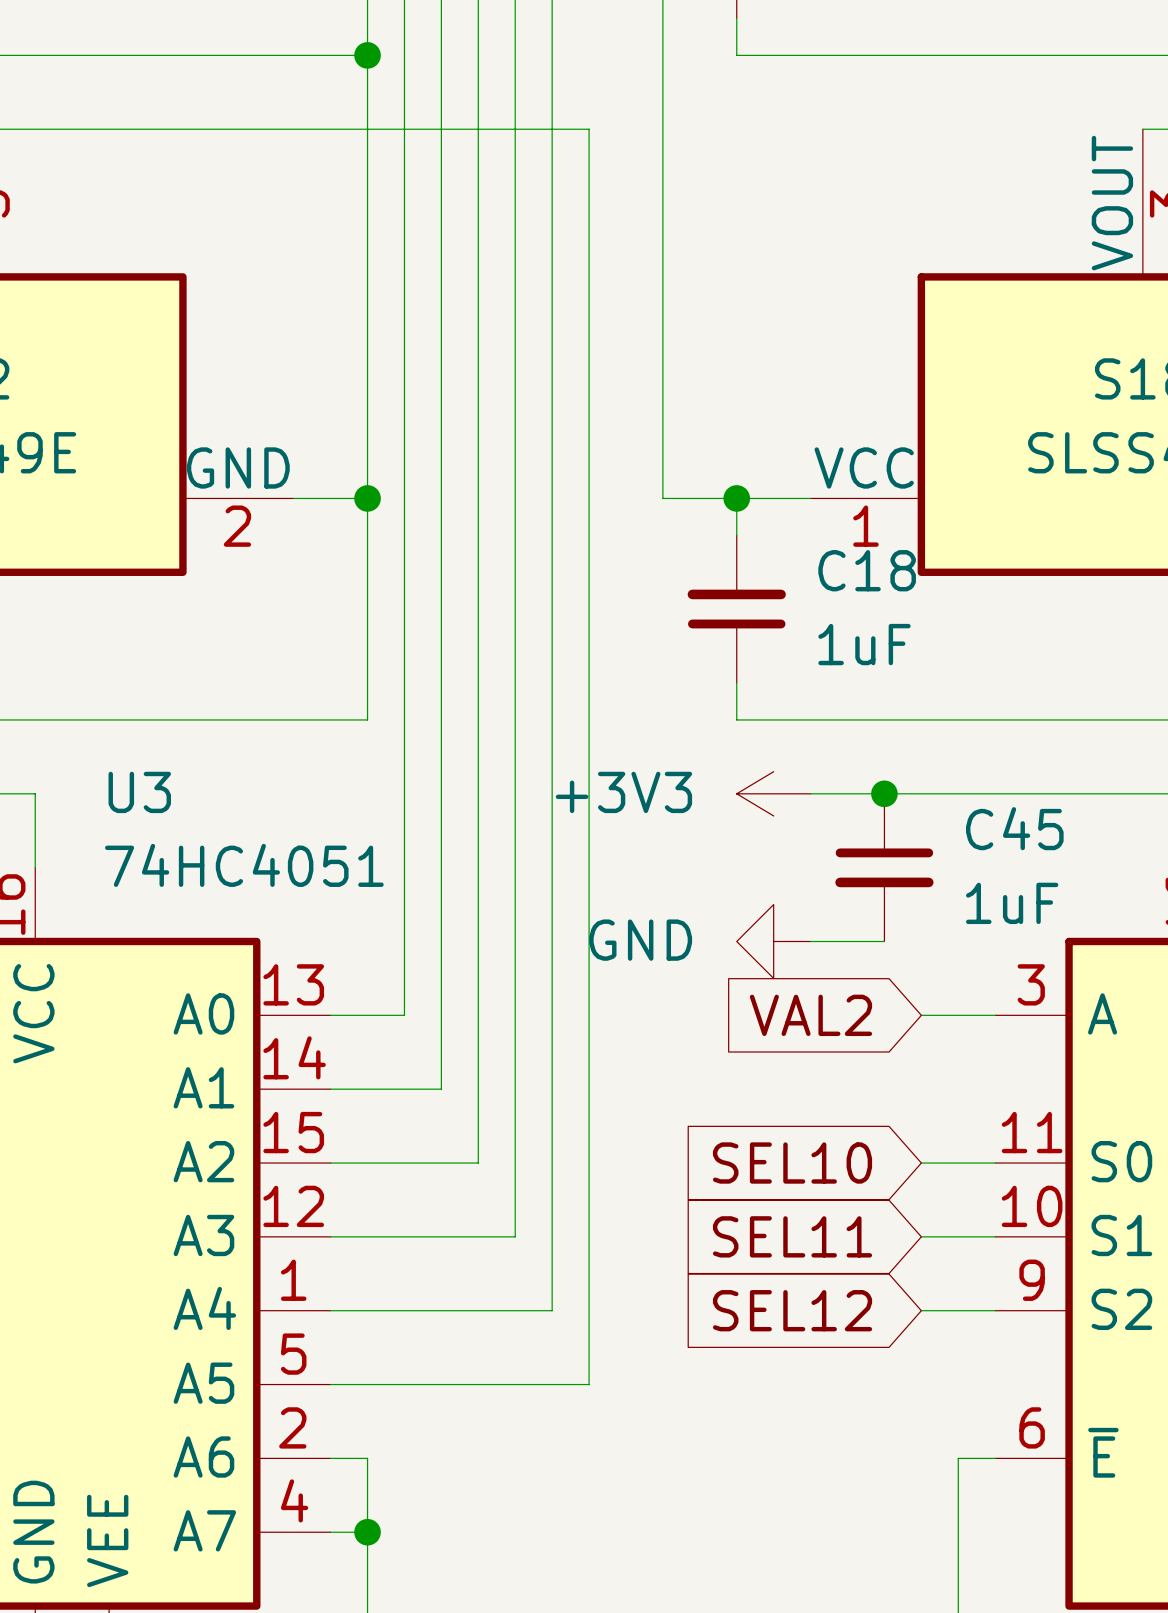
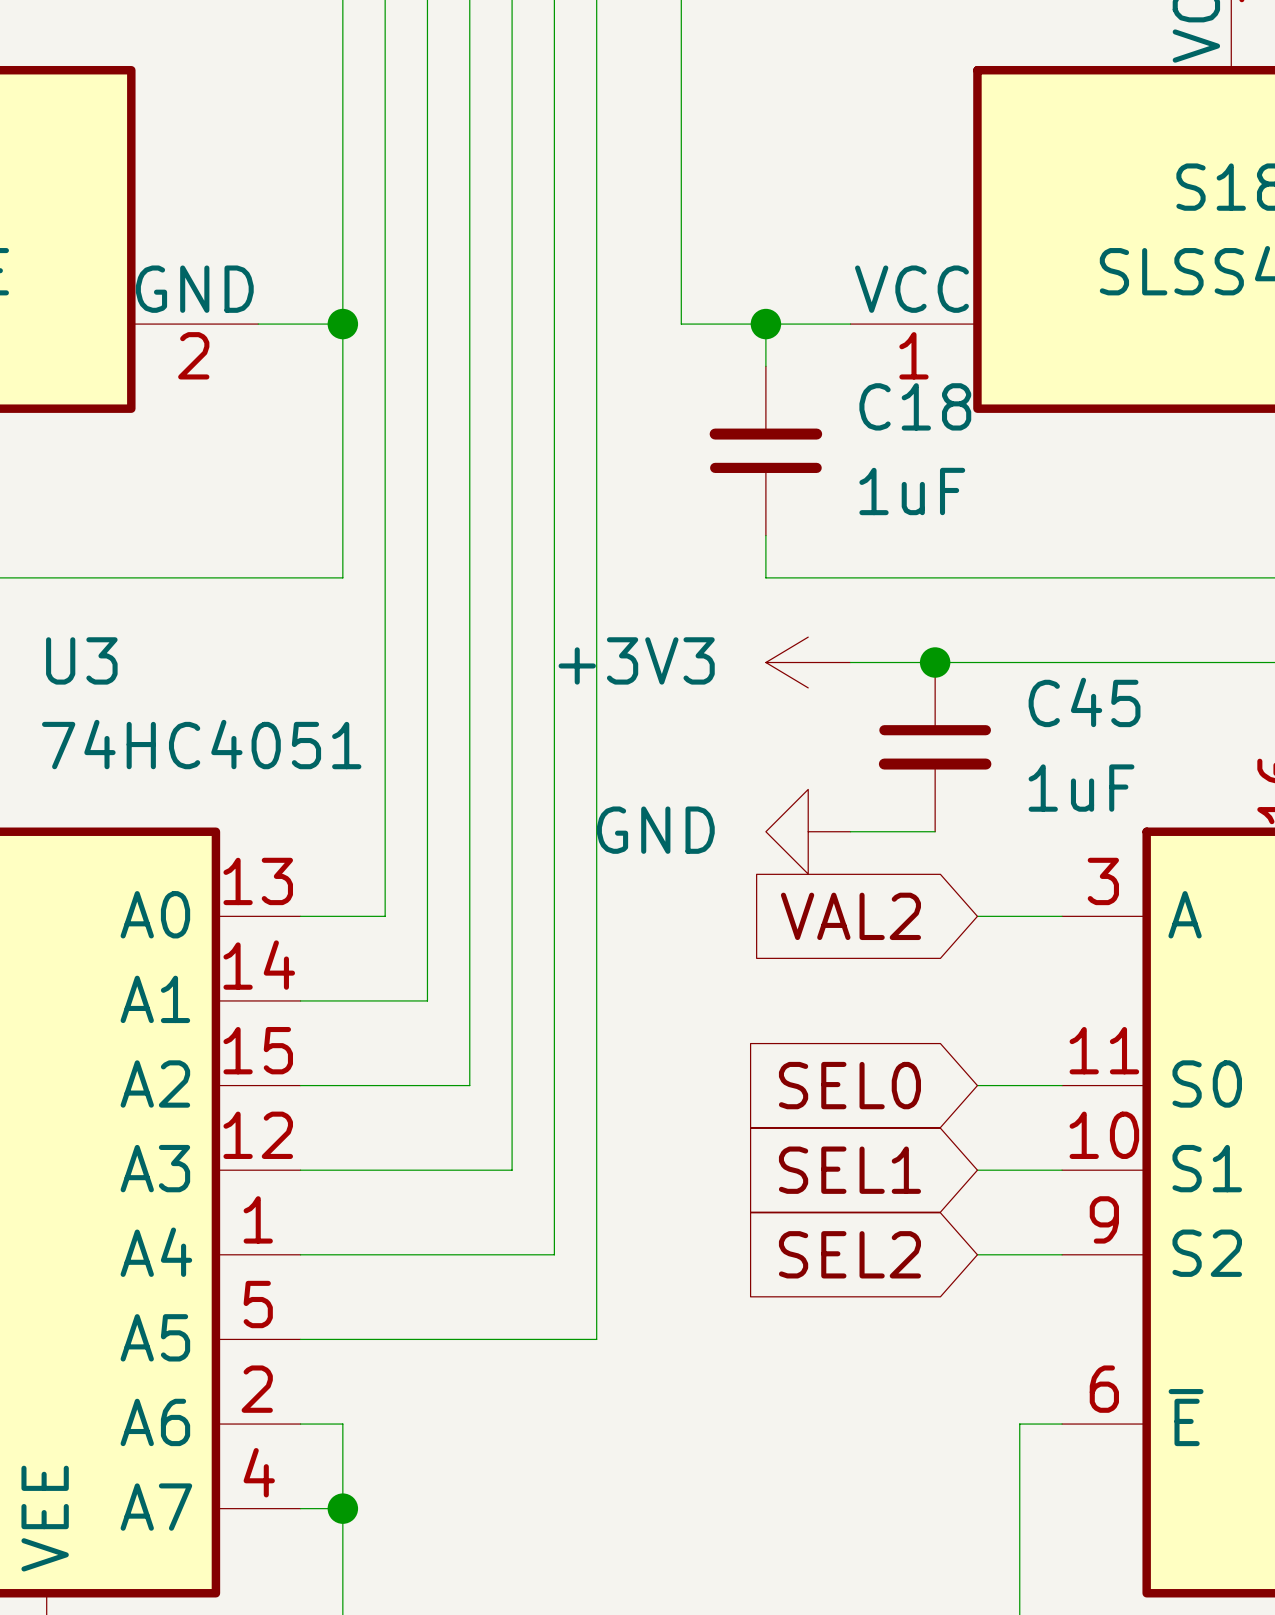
global label: SEL10 (792, 1163) -> SEL0 (849, 1085)
global label: SEL11 (792, 1236) -> SEL1 (849, 1170)
global label: SEL12 (792, 1310) -> SEL2 (849, 1254)

